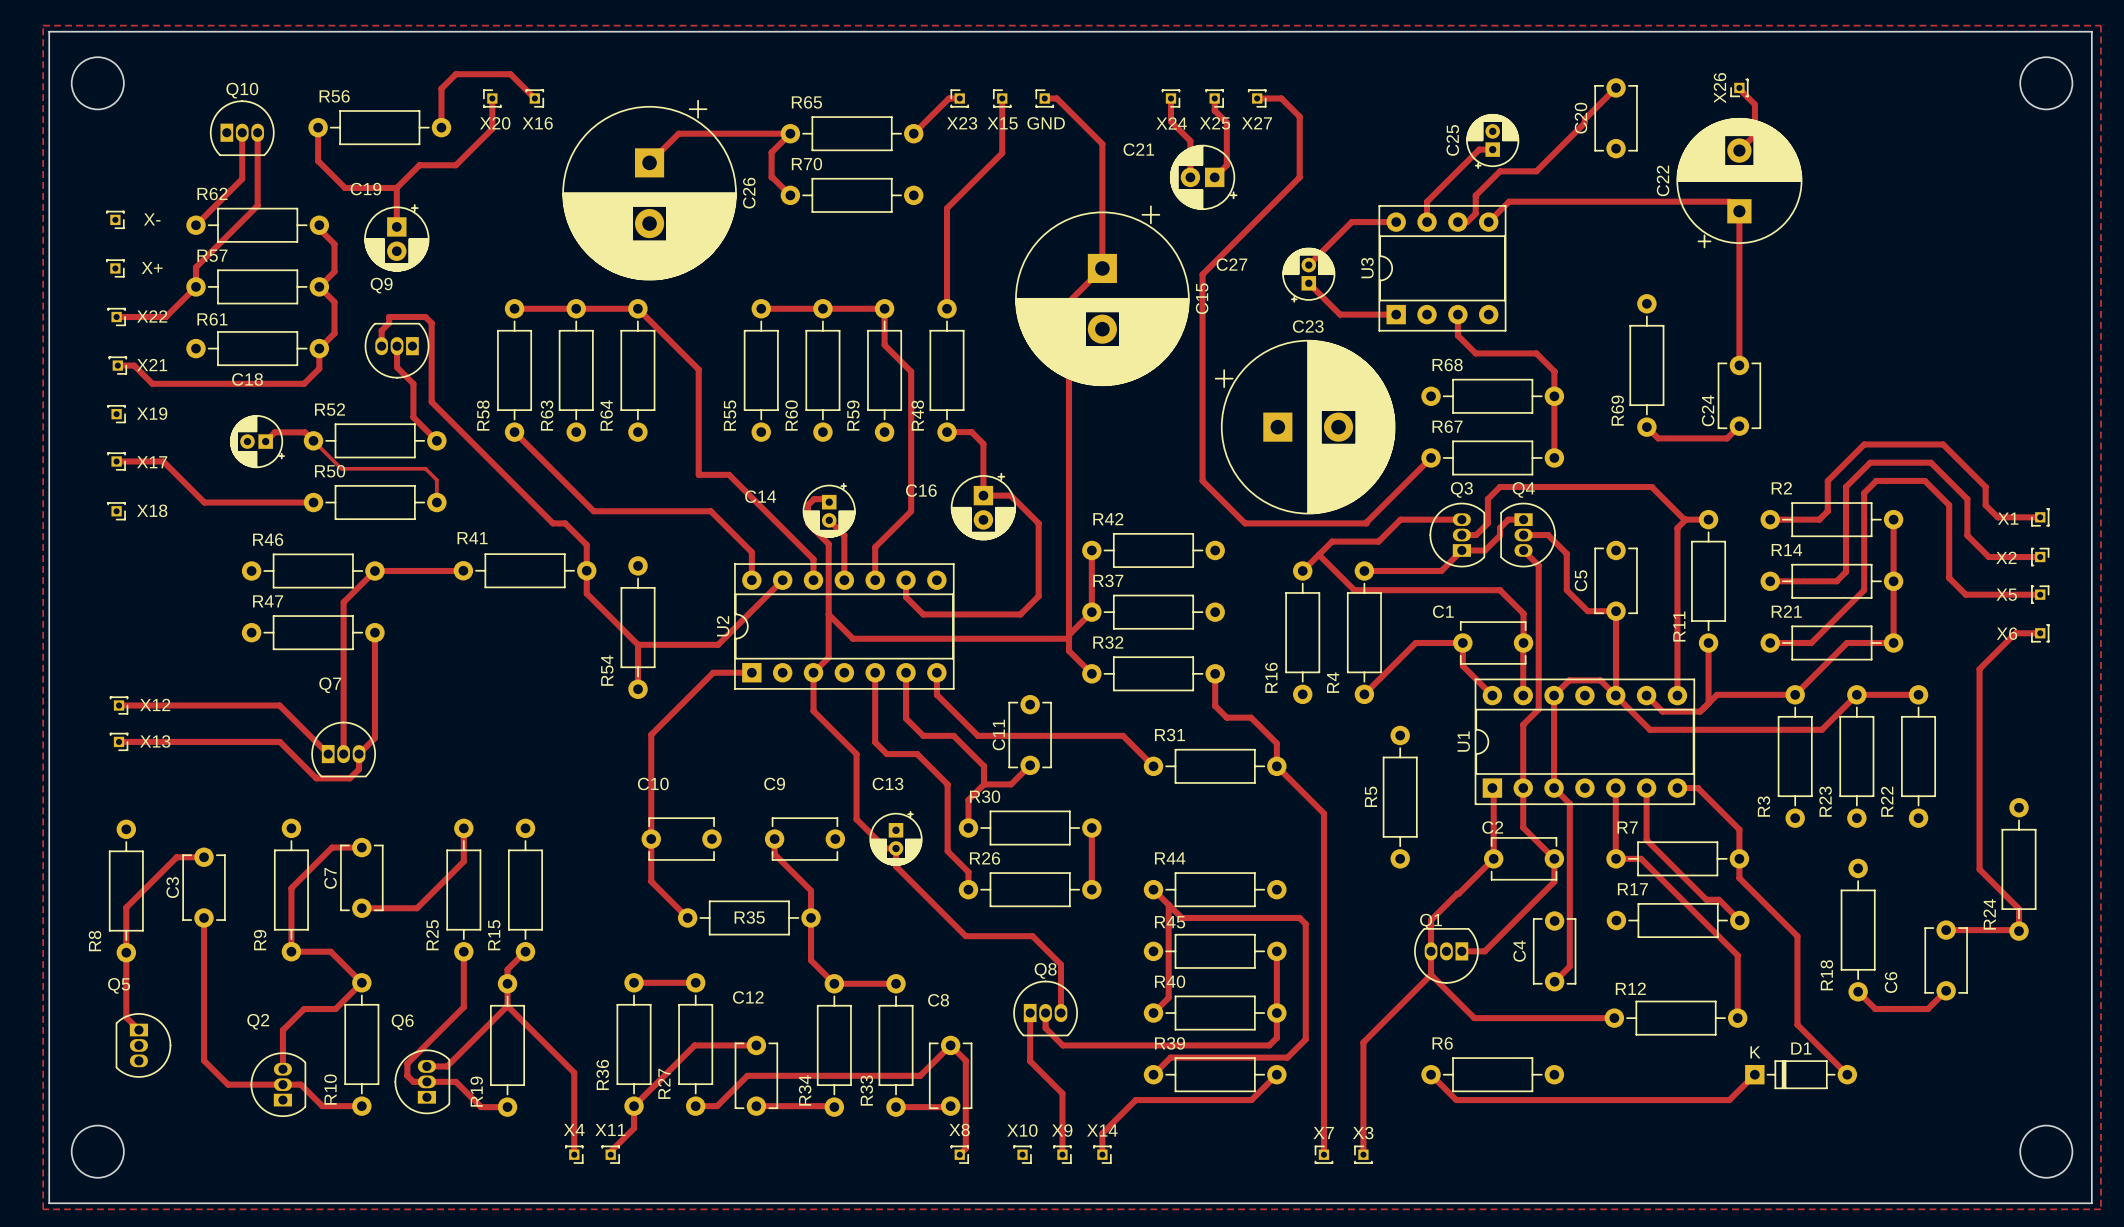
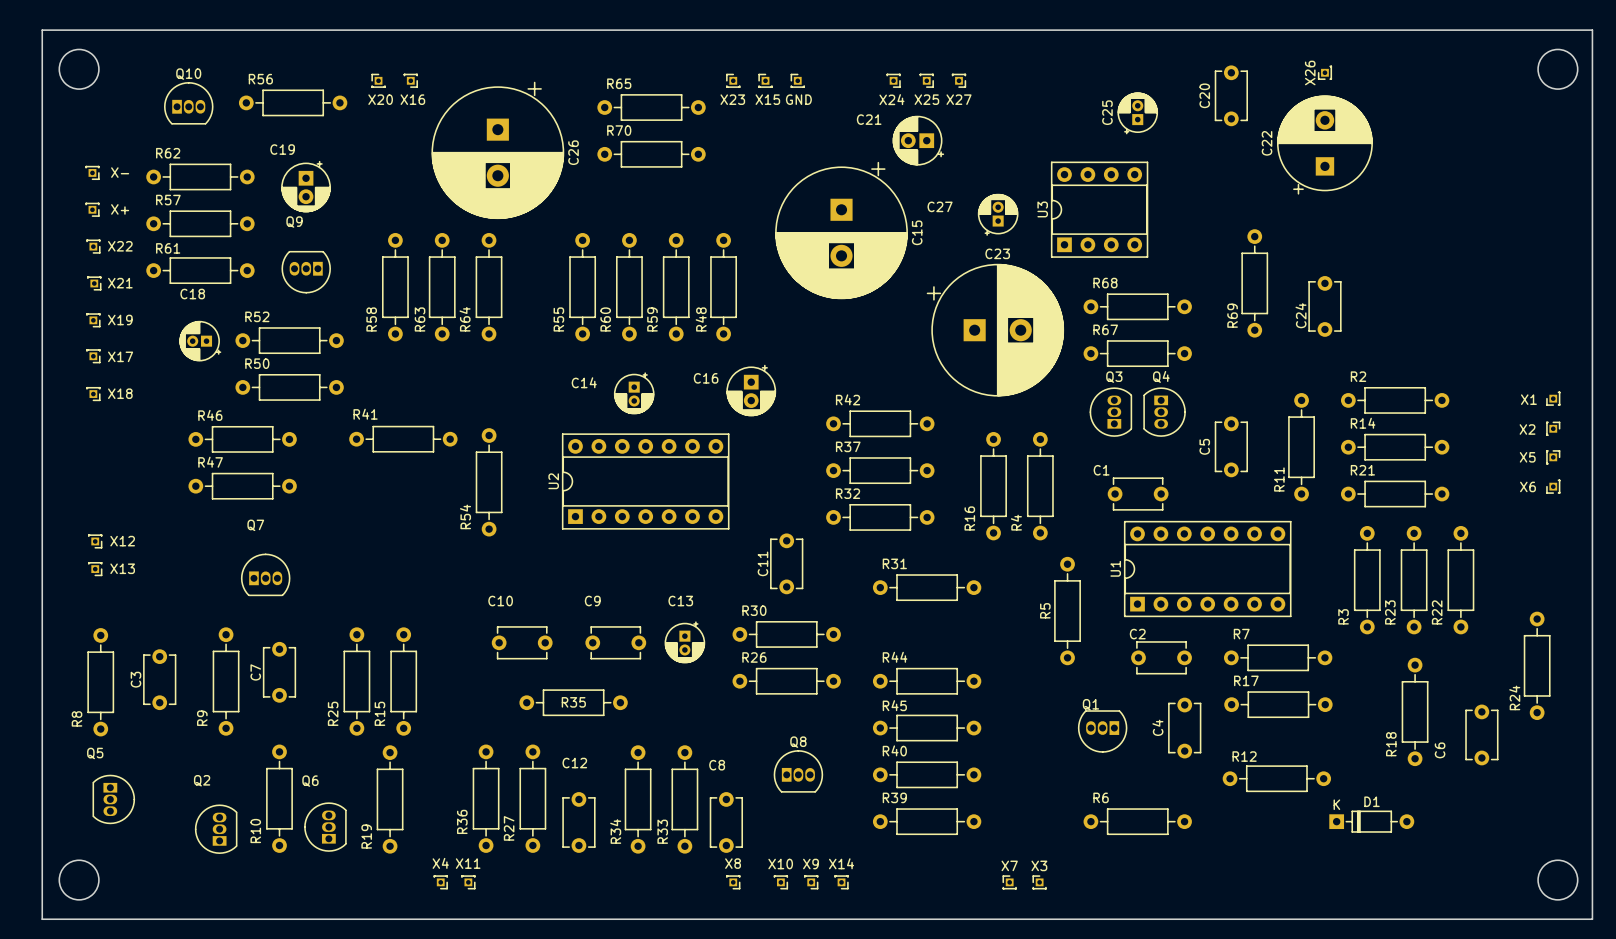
zone outline: (43, 25) (2100, 25) (2100, 1209) (43, 1209) (43, 25) -> none
track: (1616, 87) (1584, 119) (1584, 122) (1536, 171) (1500, 171) (1475, 195) (1475, 213) (1467, 222) (1457, 222) -> none
track: (1739, 87) (1754, 104) (1754, 135) (1739, 150) -> none
track: (492, 98) (492, 128) (455, 165) (419, 165) (396, 187) -> none
track: (534, 98) (510, 74) (455, 74) (441, 88) (441, 127) -> none
track: (959, 98) (948, 98) (913, 133) -> none
track: (1002, 98) (1002, 153) (947, 208) (947, 308) -> none
track: (1044, 98) (1056, 98) (1102, 144) (1102, 268) (1069, 301) (1069, 651) (1091, 673) -> none
track: (1170, 98) (1170, 121) (1190, 140) (1190, 177) -> none
track: (1214, 98) (1214, 110) (1226, 122) (1226, 165) (1214, 177) -> none
track: (1257, 98) (1281, 98) (1299, 116) (1299, 177) (1202, 274) (1202, 480) (1245, 523) (1366, 523) (1431, 457) -> none
track: (318, 127) (318, 161) (345, 187) (396, 187) -> none
track: (242, 132) (242, 178) (196, 225) -> none
track: (257, 132) (257, 205) (196, 267) (196, 286) (165, 317) (116, 317) -> none
track: (1492, 149) (1479, 149) (1427, 201) (1427, 222) -> none
track: (649, 162) (678, 133) (790, 133) (771, 152) (771, 177) (790, 195) -> none
track: (396, 187) (396, 226) -> none
track: (1396, 222) (1351, 222) (1308, 265) -> none
track: (1488, 222) (1509, 201) (1729, 201) (1739, 211) (1739, 365) -> none
track: (319, 225) (316, 225) (334, 244) (334, 271) (319, 286) (334, 302) (334, 333) (319, 348) (319, 368) (304, 383) (152, 383) (134, 365) (117, 365) -> none
track: (1308, 283) (1340, 314) (1396, 314) -> none
track: (514, 308) (637, 308) (698, 369) (698, 474) (729, 474) (813, 559) (813, 580) -> none
track: (761, 308) (884, 308) (884, 345) (911, 371) (911, 511) (875, 547) (875, 580) -> none
track: (1457, 314) (1457, 335) (1475, 353) (1536, 353) (1554, 371) (1554, 457) -> none
track: (381, 346) (381, 330) (389, 323) (389, 317) (425, 317) (431, 323) (431, 402) (553, 523) (565, 523) (586, 544) (586, 593) (638, 644) -> none
track: (397, 346) (397, 367) (413, 383) (413, 417) (436, 440) -> none
track: (1646, 427) (1658, 438) (1727, 438) (1738, 427) -> none
track: (514, 432) (593, 511) (710, 511) (751, 552) (751, 580) -> none
track: (947, 432) (971, 432) (983, 443) (983, 495) (1010, 495) (1038, 523) (1038, 596) (1020, 614) (923, 614) (906, 597) (906, 580) -> none
track: (313, 440) (305, 432) (274, 432) (265, 441) -> none
track: (313, 440) (341, 468) (425, 468) (436, 480) (436, 502) -> none
track: (116, 461) (163, 461) (204, 502) (313, 502) -> none
track: (829, 502) (826, 499) (814, 499) (808, 505) (808, 523) (828, 544) (828, 657) (813, 672) (813, 711) (856, 754) (856, 819) (885, 848) (896, 848) (896, 866) (965, 936) (1032, 936) (1061, 964) (1061, 1013) -> none
track: (2040, 517) (1997, 517) (1985, 505) (1985, 486) (1943, 444) (1864, 444) (1827, 480) (1827, 511) (1819, 519) (1770, 519) -> none
track: (1461, 519) (1400, 519) (1378, 541) (1332, 541) (1302, 571) -> none
track: (1523, 519) (1508, 519) (1500, 528) (1500, 535) (1485, 550) (1461, 550) (1441, 571) (1364, 571) -> none
track: (1685, 519) (1677, 528) (1677, 695) -> none
track: (1708, 519) (1684, 519) (1651, 486) (1500, 486) (1487, 499) (1487, 523) (1476, 535) (1461, 535) -> none
track: (1893, 519) (1893, 642) (1847, 642) (1795, 694) (1717, 694) (1700, 711) (1662, 711) (1646, 695) -> none
track: (829, 520) (844, 535) (844, 580) -> none
track: (1523, 535) (1548, 535) (1566, 553) (1566, 590) (1587, 611) (1616, 611) (1615, 695) -> none
track: (1091, 550) (1091, 612) (1069, 634) -> none
track: (1523, 550) (1538, 565) (1538, 709) (1523, 724) (1523, 827) (1554, 858) (1554, 881) (1484, 951) (1461, 951) -> none
track: (1318, 554) (1354, 590) (1500, 590) (1523, 613) (1523, 695) -> none
track: (2040, 557) (1988, 557) (1967, 535) (1967, 499) (1930, 462) (1870, 462) (1846, 486) (1846, 571) (1836, 581) (1770, 581) -> none
track: (463, 570) (374, 571) (343, 602) (343, 754) -> none
track: (782, 580) (718, 644) (638, 644) -> none
track: (2040, 594) (1965, 594) (1949, 578) (1949, 505) (1924, 480) (1876, 480) (1864, 493) (1864, 590) (1811, 642) (1770, 642) -> none
track: (828, 614) (852, 638) (1069, 638) -> none
track: (374, 632) (374, 738) (359, 754) (359, 769) (349, 778) (316, 778) (279, 741) (119, 741) -> none
track: (2040, 633) (2015, 633) (1979, 669) (1979, 869) (2019, 908) (2019, 931) (1946, 930) -> none
track: (1708, 642) (1708, 703) -> none
track: (638, 644) (638, 689) -> none
track: (751, 672) (713, 672) (651, 734) (651, 881) (687, 917) -> none
track: (875, 672) (875, 742) (886, 754) (917, 754) (947, 784) (947, 851) (968, 872) (968, 889) -> none
track: (906, 672) (906, 718) (923, 735) (953, 735) (984, 766) (984, 784) -> none
track: (936, 672) (936, 694) (977, 735) (1123, 735) (1153, 766) -> none
track: (1215, 673) (1215, 706) (1226, 717) (1251, 717) (1276, 743) (1276, 766) (1323, 813) (1323, 1154) -> none
track: (1364, 694) (1415, 642) (1462, 642) (1462, 665) (1492, 695) -> none
track: (1918, 694) (1856, 694) (1821, 729) (1649, 729) (1600, 680) (1569, 680) (1554, 695) (1554, 788) (1569, 803) (1569, 966) (1554, 981) -> none
track: (119, 705) (279, 705) (328, 754) -> none
track: (1030, 765) (1011, 784) (984, 784) -> none
track: (984, 784) (968, 799) (968, 828) -> none
track: (1492, 788) (1493, 858) (1431, 920) (1431, 974) -> none
track: (1615, 788) (1615, 858) (1641, 858) (1737, 955) (1737, 1018) -> none
track: (1646, 788) (1646, 839) (1706, 899) (1719, 899) (1739, 920) -> none
track: (1677, 788) (1697, 788) (1739, 829) (1739, 878) (1797, 936) (1797, 1024) (1847, 1074) -> none
track: (463, 828) (463, 861) (417, 908) (361, 908) -> none
track: (1091, 828) (1091, 889) -> none
track: (774, 839) (774, 854) (811, 890) (811, 960) (834, 983) (896, 983) -> none
track: (361, 847) (332, 847) (291, 888) (291, 951) (330, 951) (361, 982) (335, 1009) (304, 1009) (282, 1030) (282, 1069) -> none
track: (204, 857) (176, 857) (126, 907) (126, 1017) (138, 1030) -> none
track: (1153, 889) (1181, 917) (1299, 917) (1305, 924) (1305, 1039) (1287, 1057) (1170, 1057) (1153, 1074) -> none
track: (1168, 904) (1168, 997) (1153, 1013) -> none
track: (204, 917) (204, 1060) (228, 1084) (300, 1084) (322, 1106) (361, 1106) -> none
track: (463, 951) (463, 1007) (407, 1063) (407, 1075) (413, 1081) (455, 1081) (481, 1107) (507, 1107) -> none
track: (525, 951) (507, 969) (507, 1005) -> none
track: (1276, 951) (1276, 1037) (1269, 1045) (1062, 1045) (1045, 1028) (1045, 1013) -> none
track: (1431, 974) (1363, 1042) (1363, 1154) -> none
track: (1431, 974) (1474, 1018) (1614, 1018) -> none
track: (634, 982) (695, 982) -> none
track: (1946, 990) (1927, 1009) (1875, 1009) (1858, 991) -> none
track: (507, 1005) (574, 1072) (574, 1154) -> none
track: (507, 1005) (447, 1066) (426, 1066) (426, 1064) -> none
track: (1030, 1013) (1030, 1061) (1062, 1093) (1062, 1154) -> none
track: (756, 1045) (694, 1045) (634, 1106) (634, 1128) (610, 1151) (610, 1154) -> none
track: (1276, 1074) (1251, 1100) (1135, 1100) (1102, 1133) (1102, 1154) -> none
track: (1431, 1074) (1456, 1100) (1729, 1100) (1754, 1074) -> none
track: (695, 1106) (717, 1106) (747, 1075) (920, 1075) (950, 1045) (965, 1060) (965, 1148) (959, 1154) -> none
track: (756, 1106) (834, 1107) -> none
track: (950, 1106) (896, 1107) -> none

